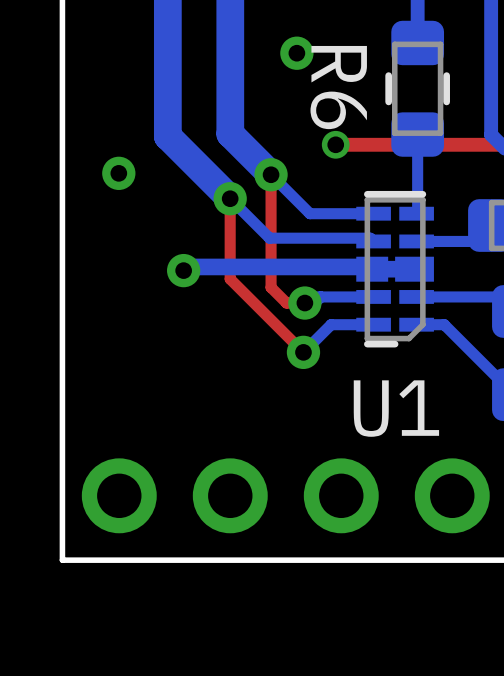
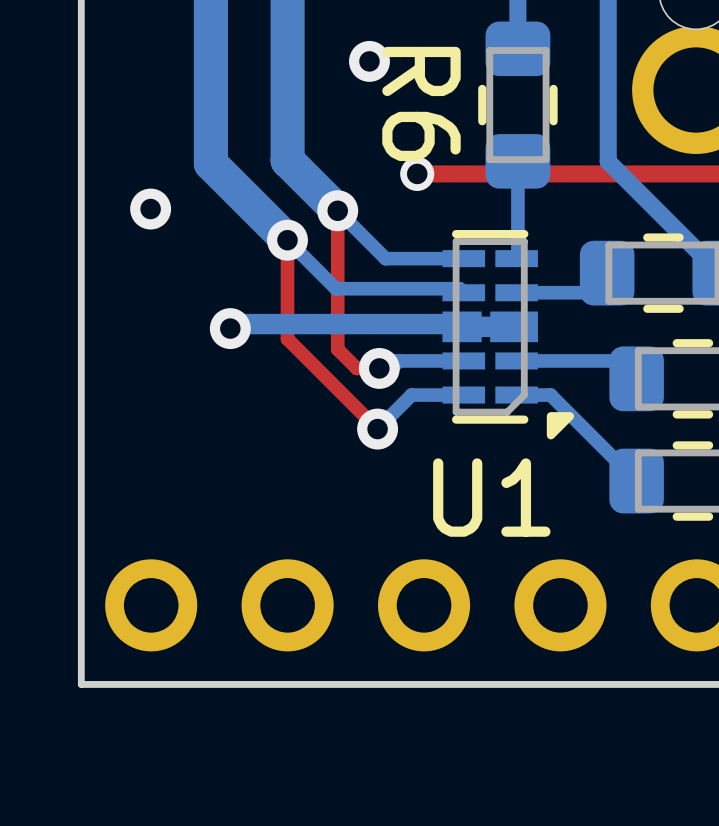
U1 footprint: [356, 190, 434, 348] -> [442, 229, 575, 440]

